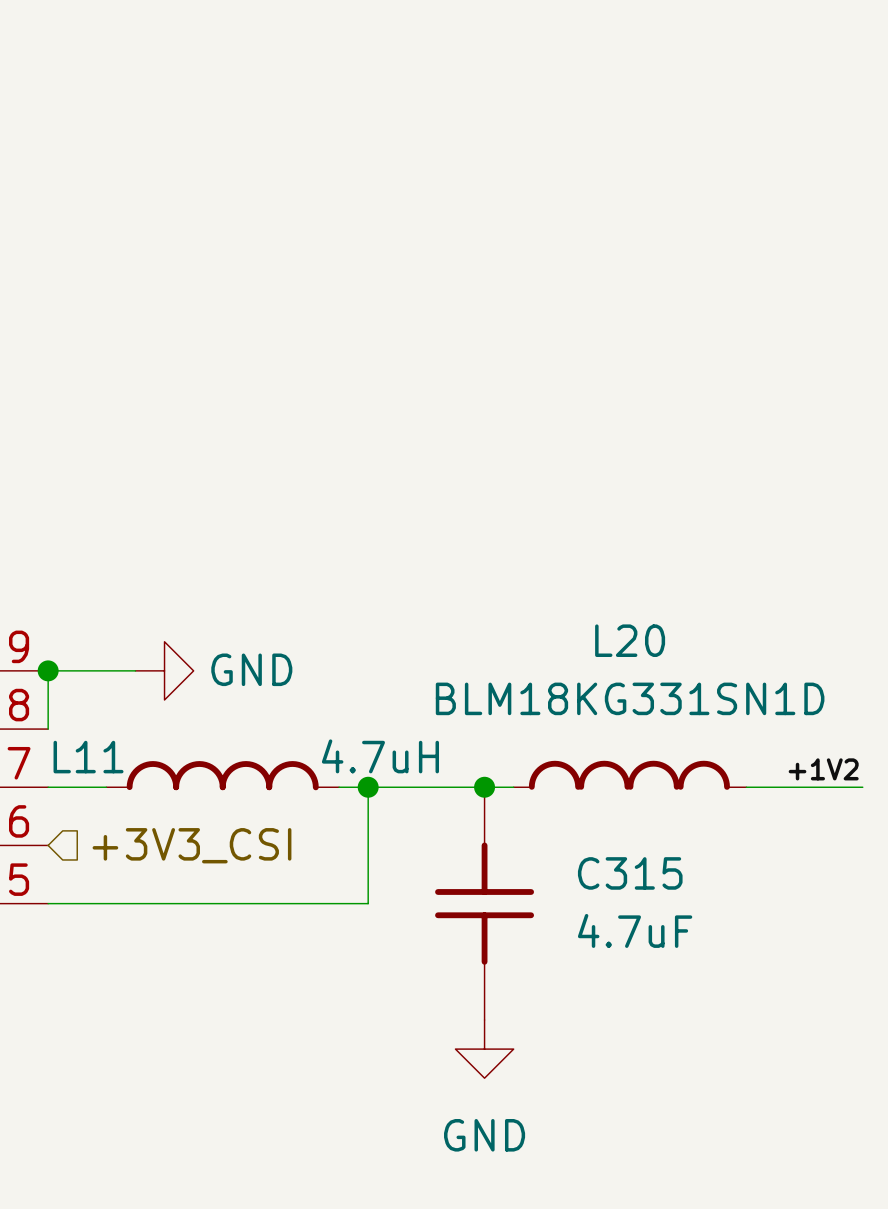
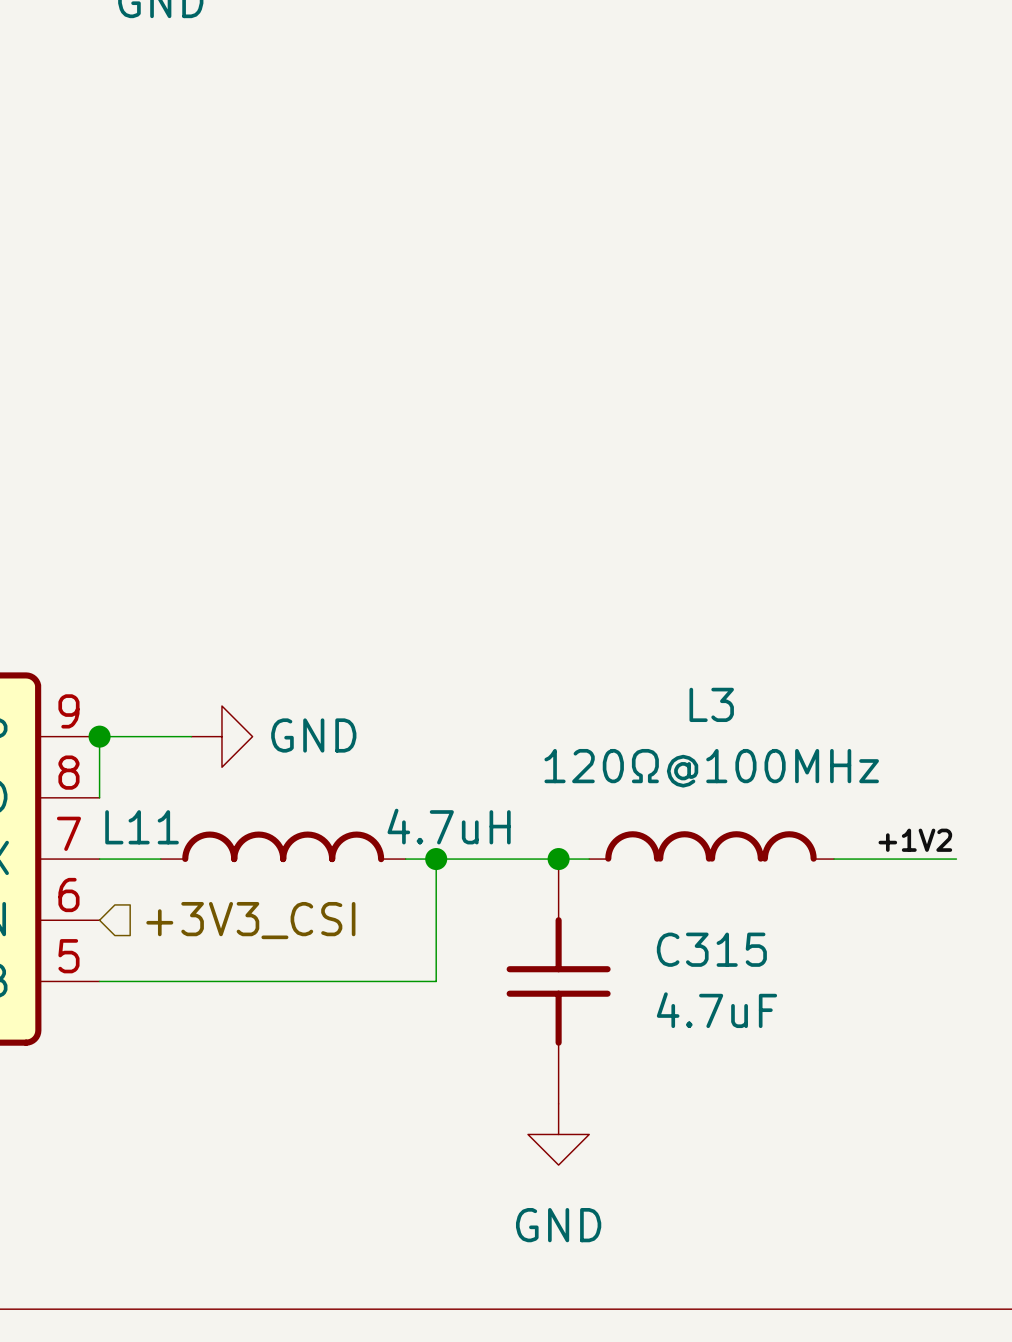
L20: BLM18KG331SN1D (630, 775) -> none
L3: none -> 120Ω@100MHz (711, 846)

